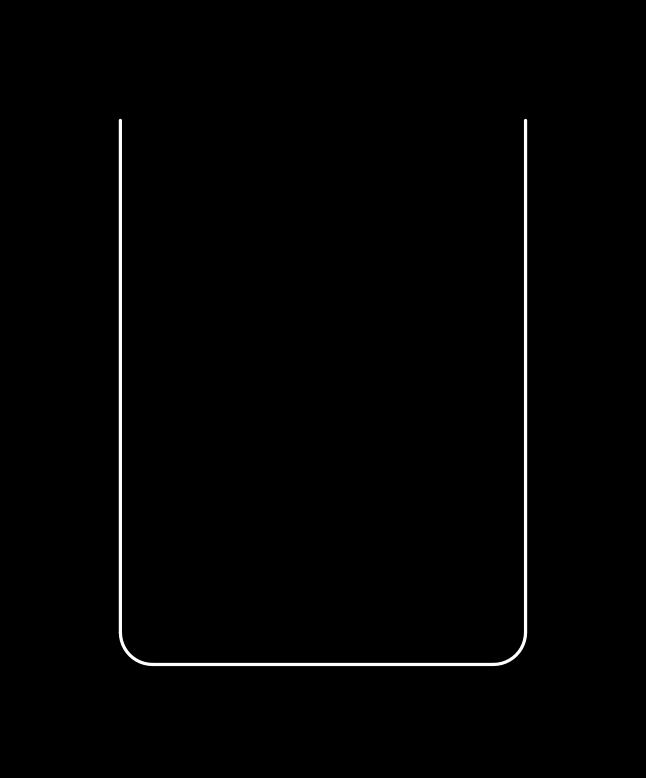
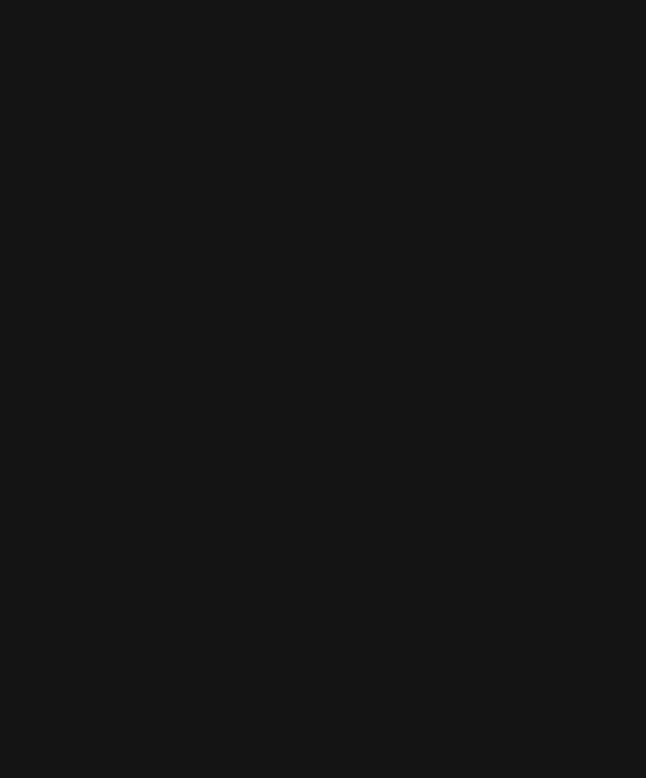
part: (322, 392) -> none

